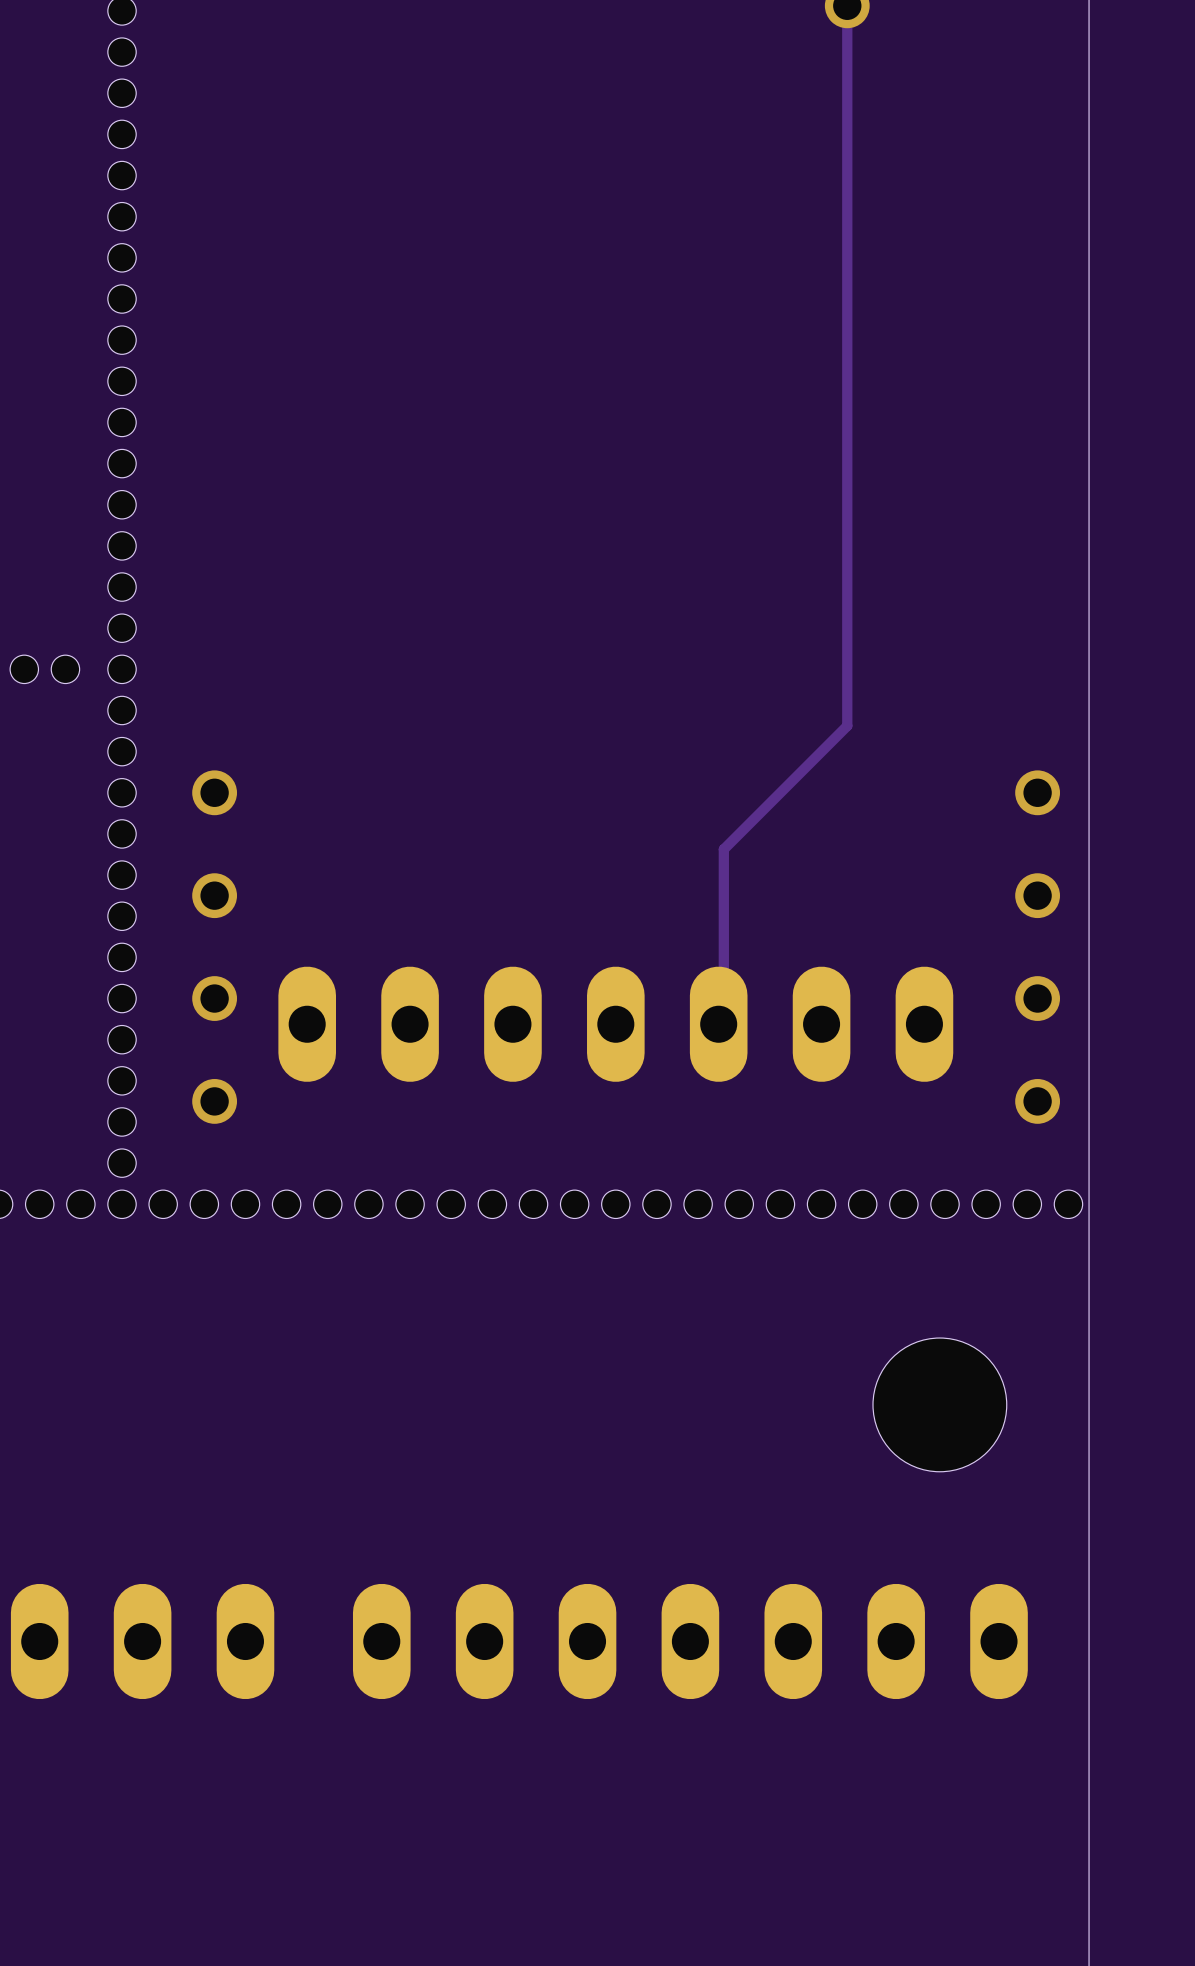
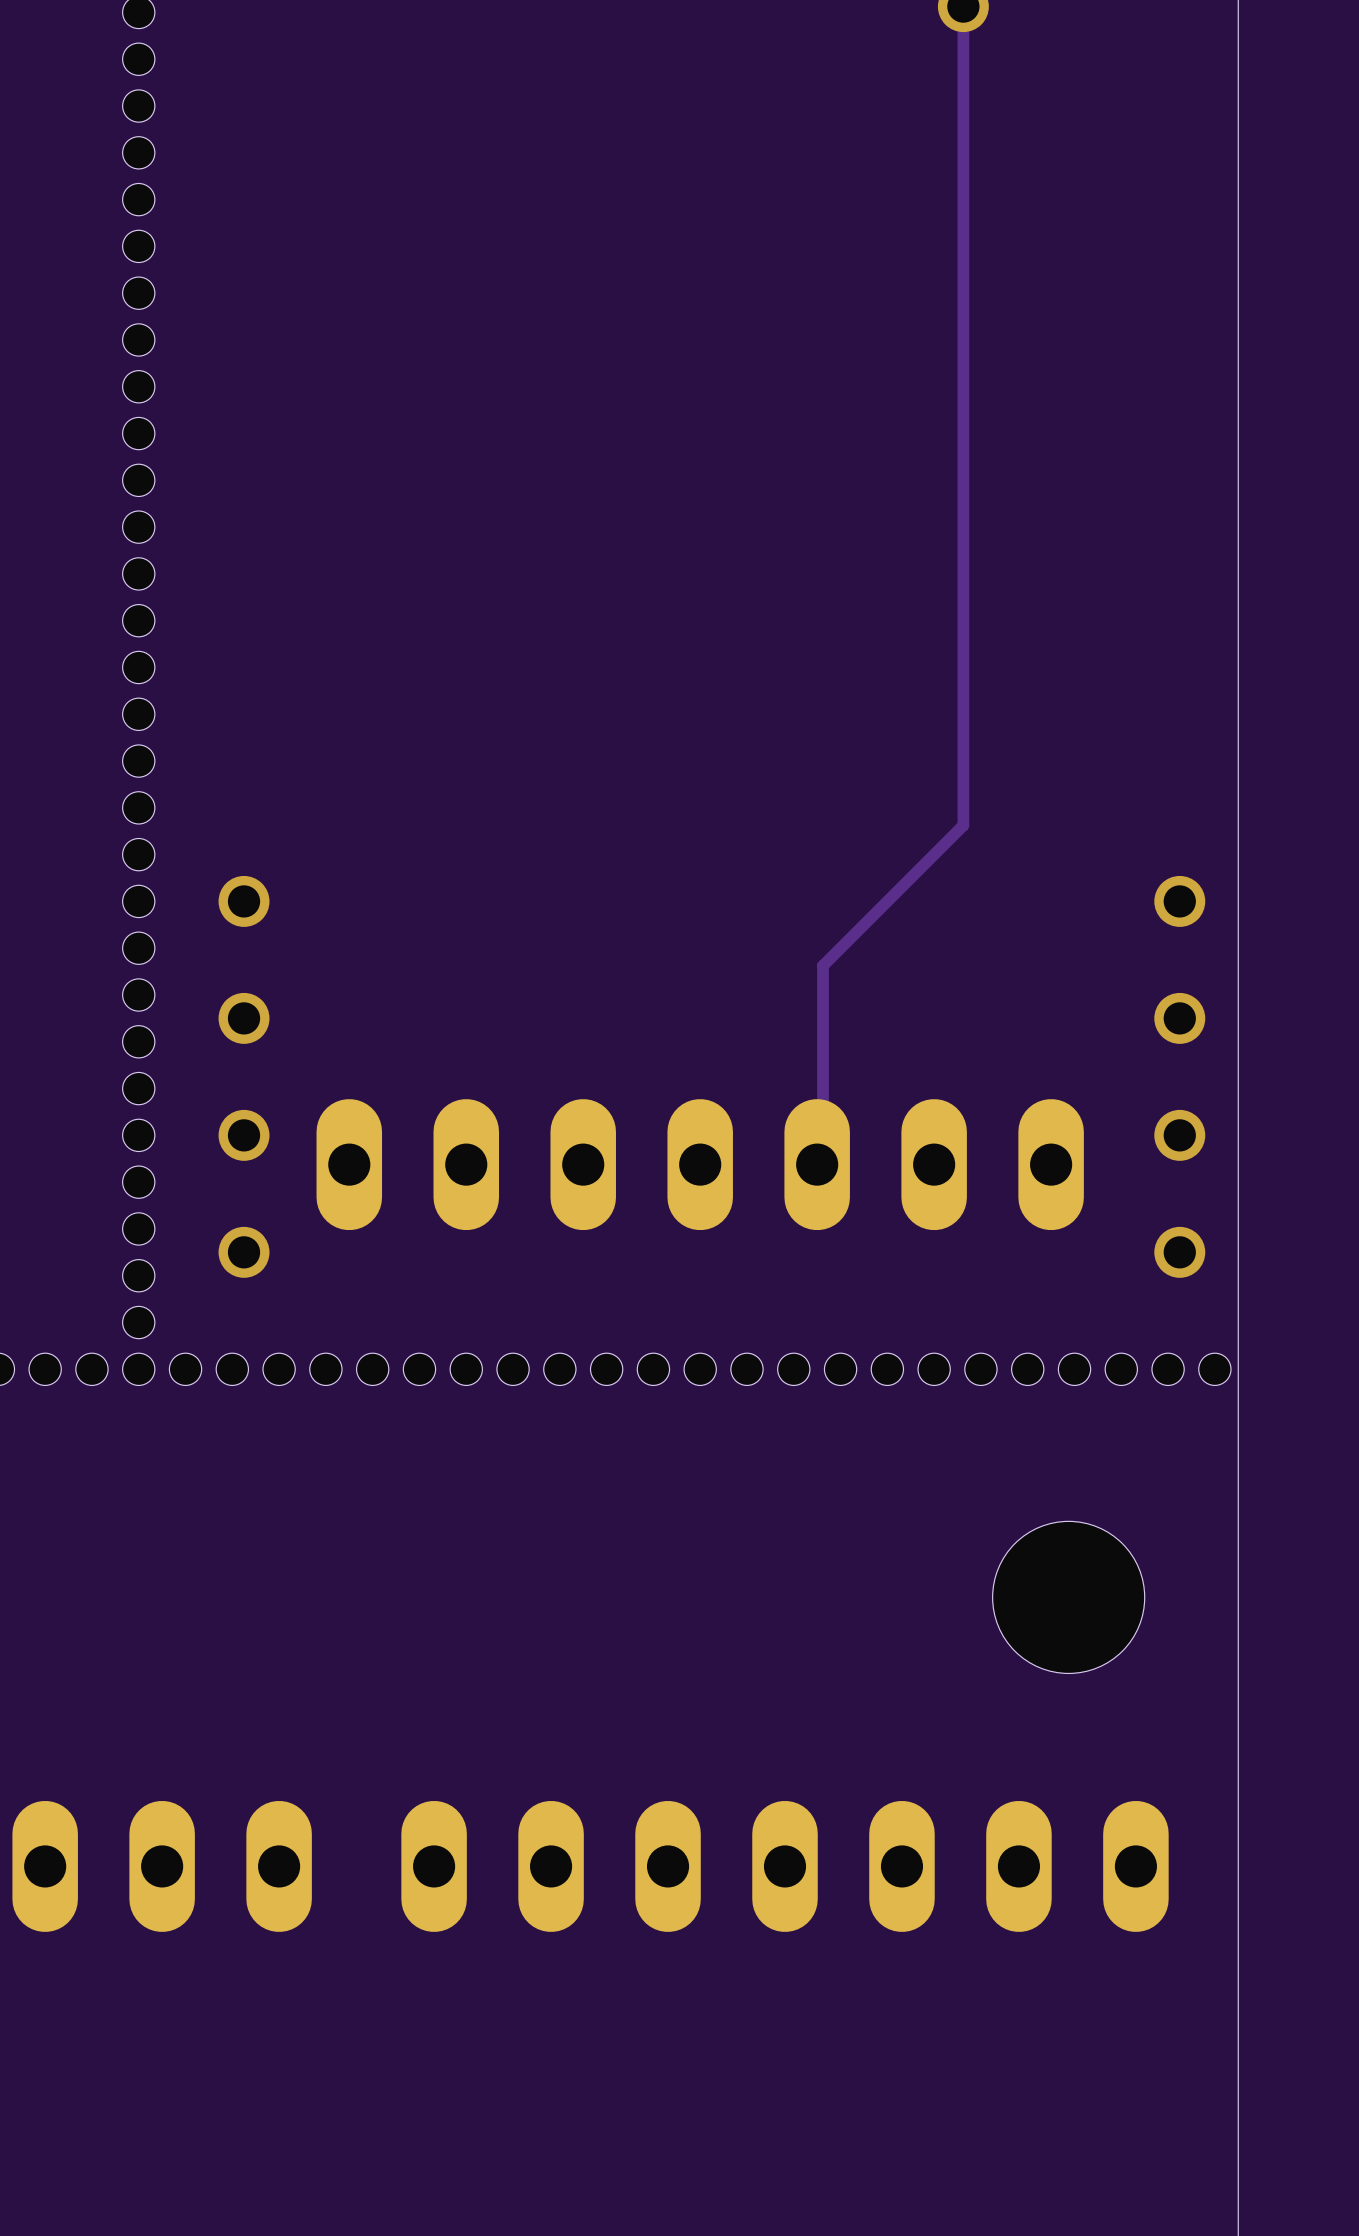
hole: (24, 669) -> none
hole: (65, 669) -> none

